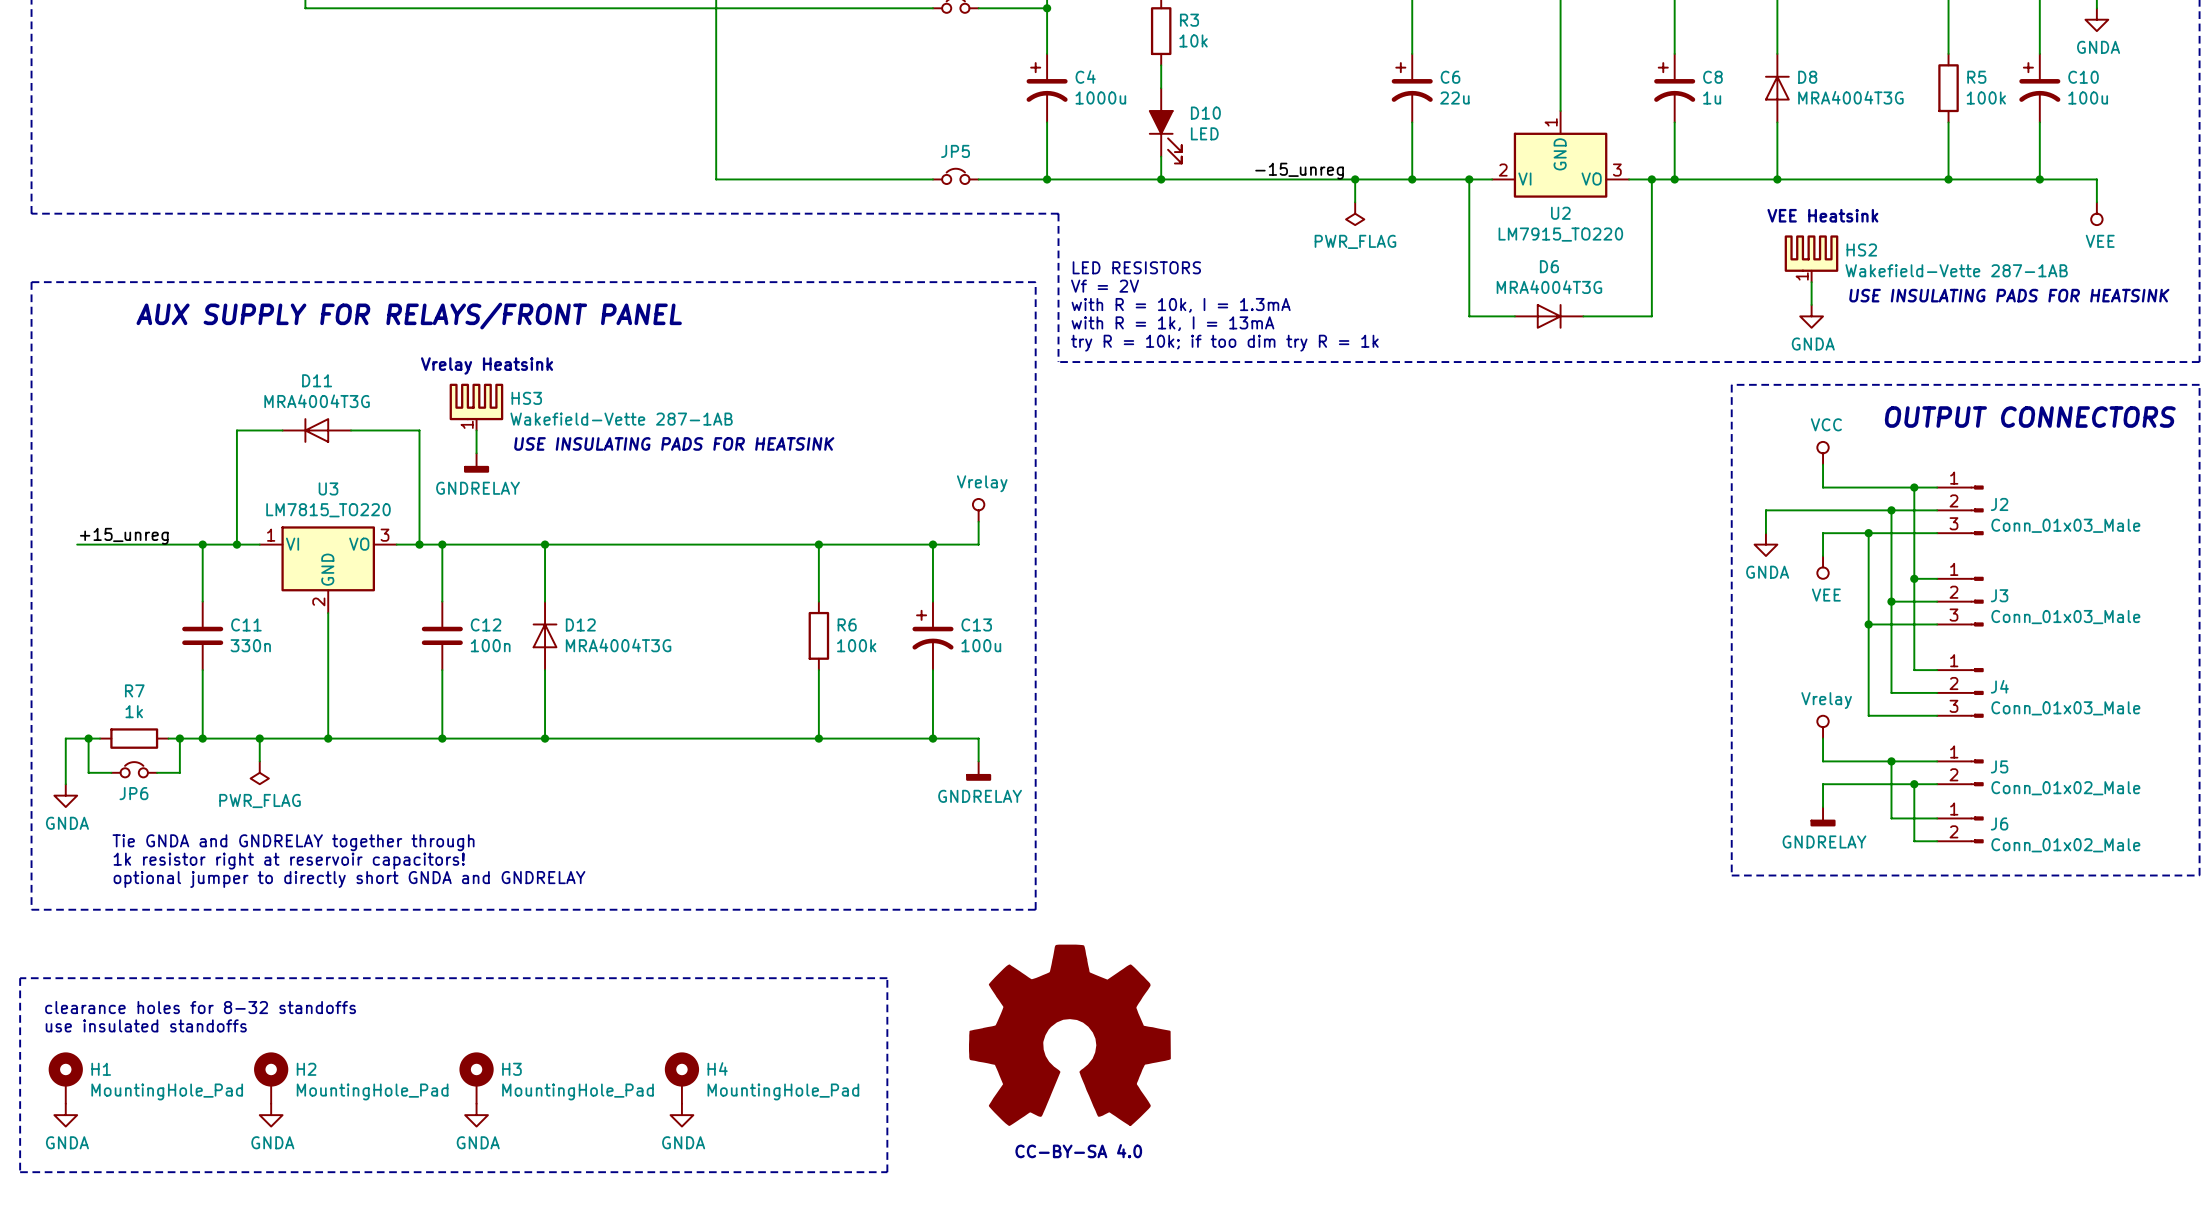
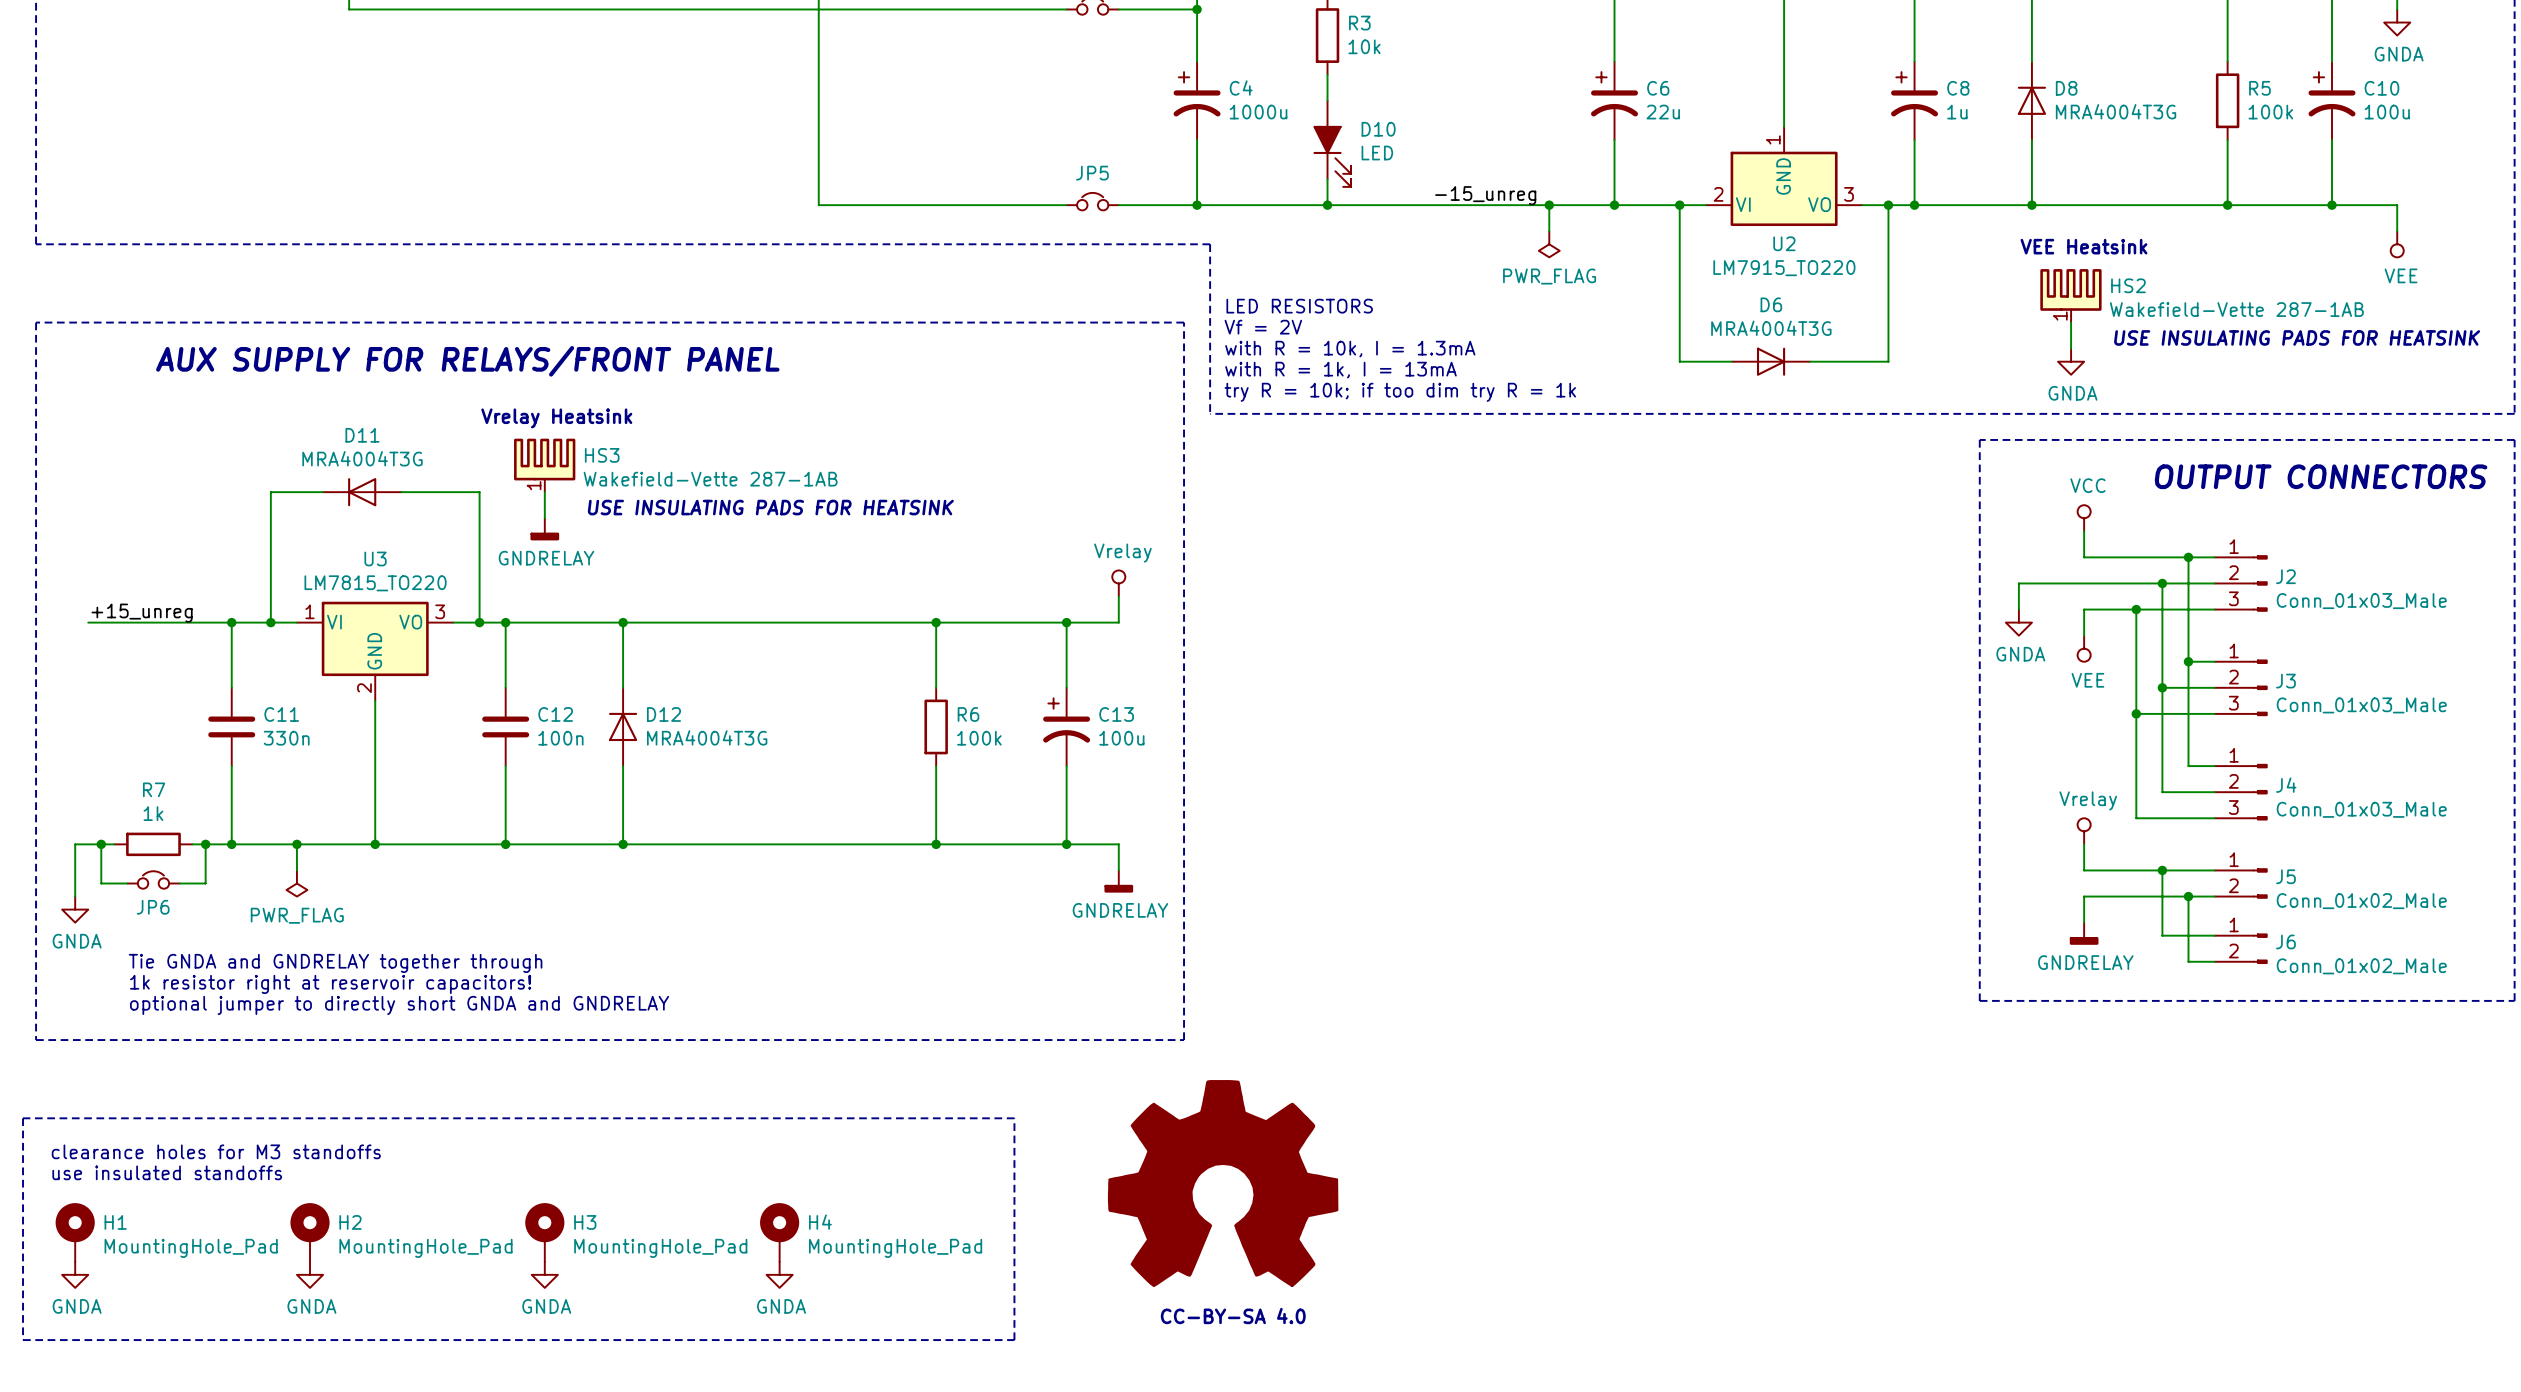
text: clearance holes for 8-32 standoffs (200, 1007) -> clearance holes for M3 standoffs (216, 1151)

